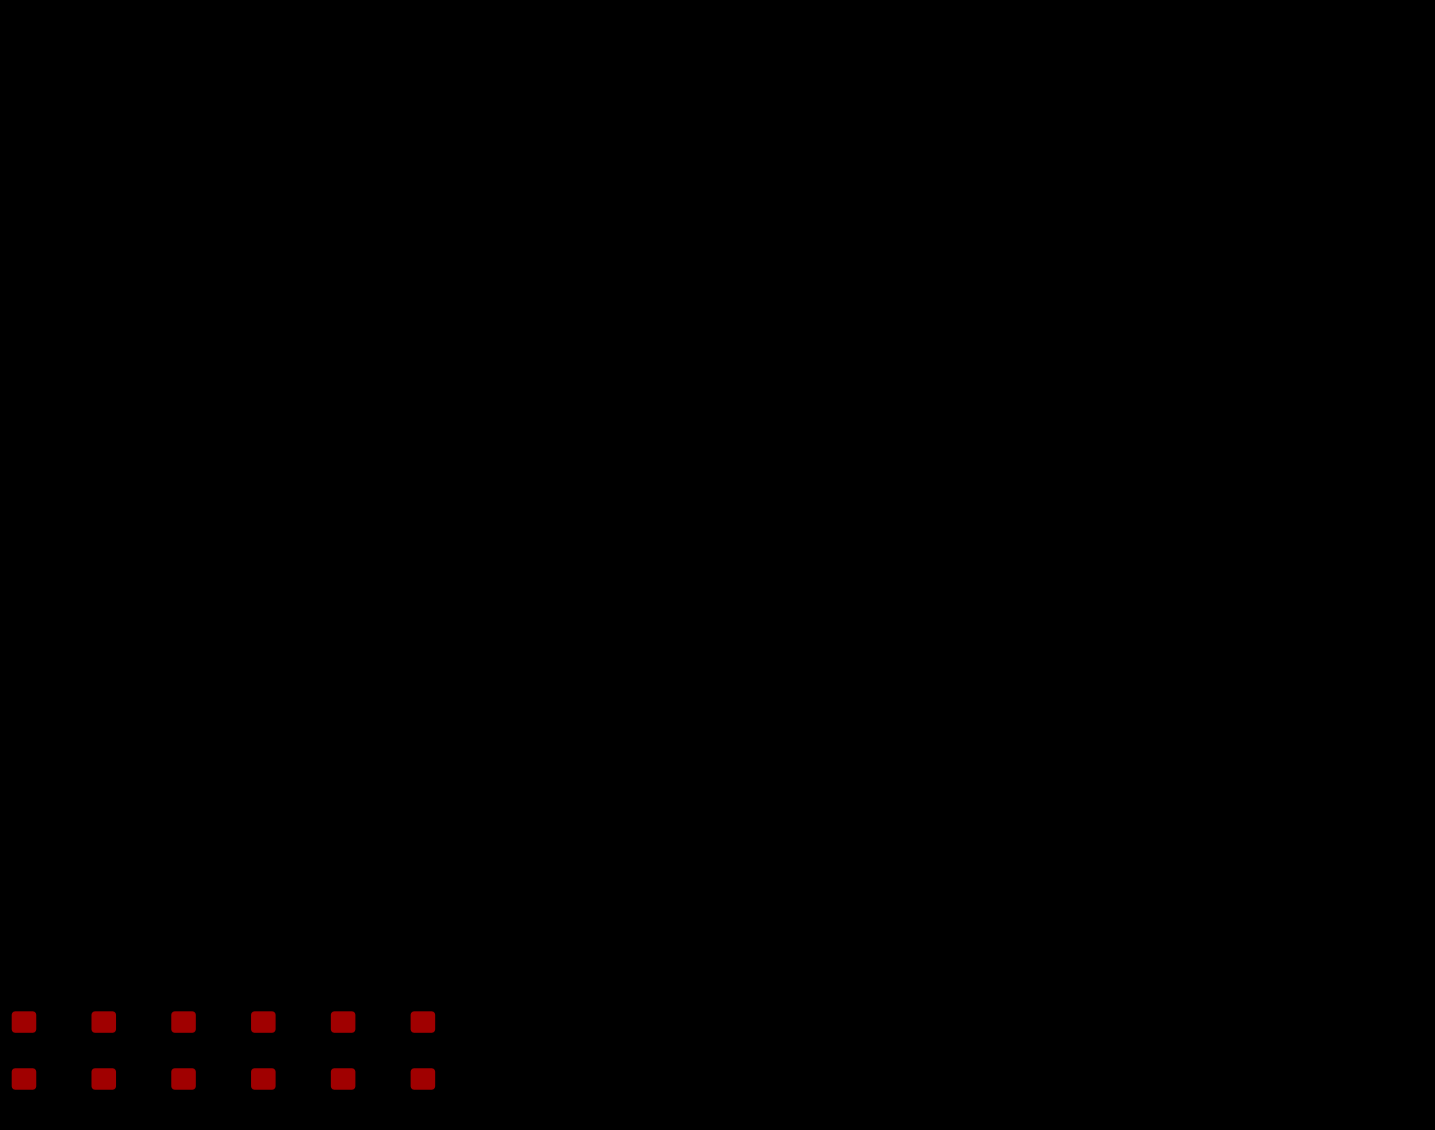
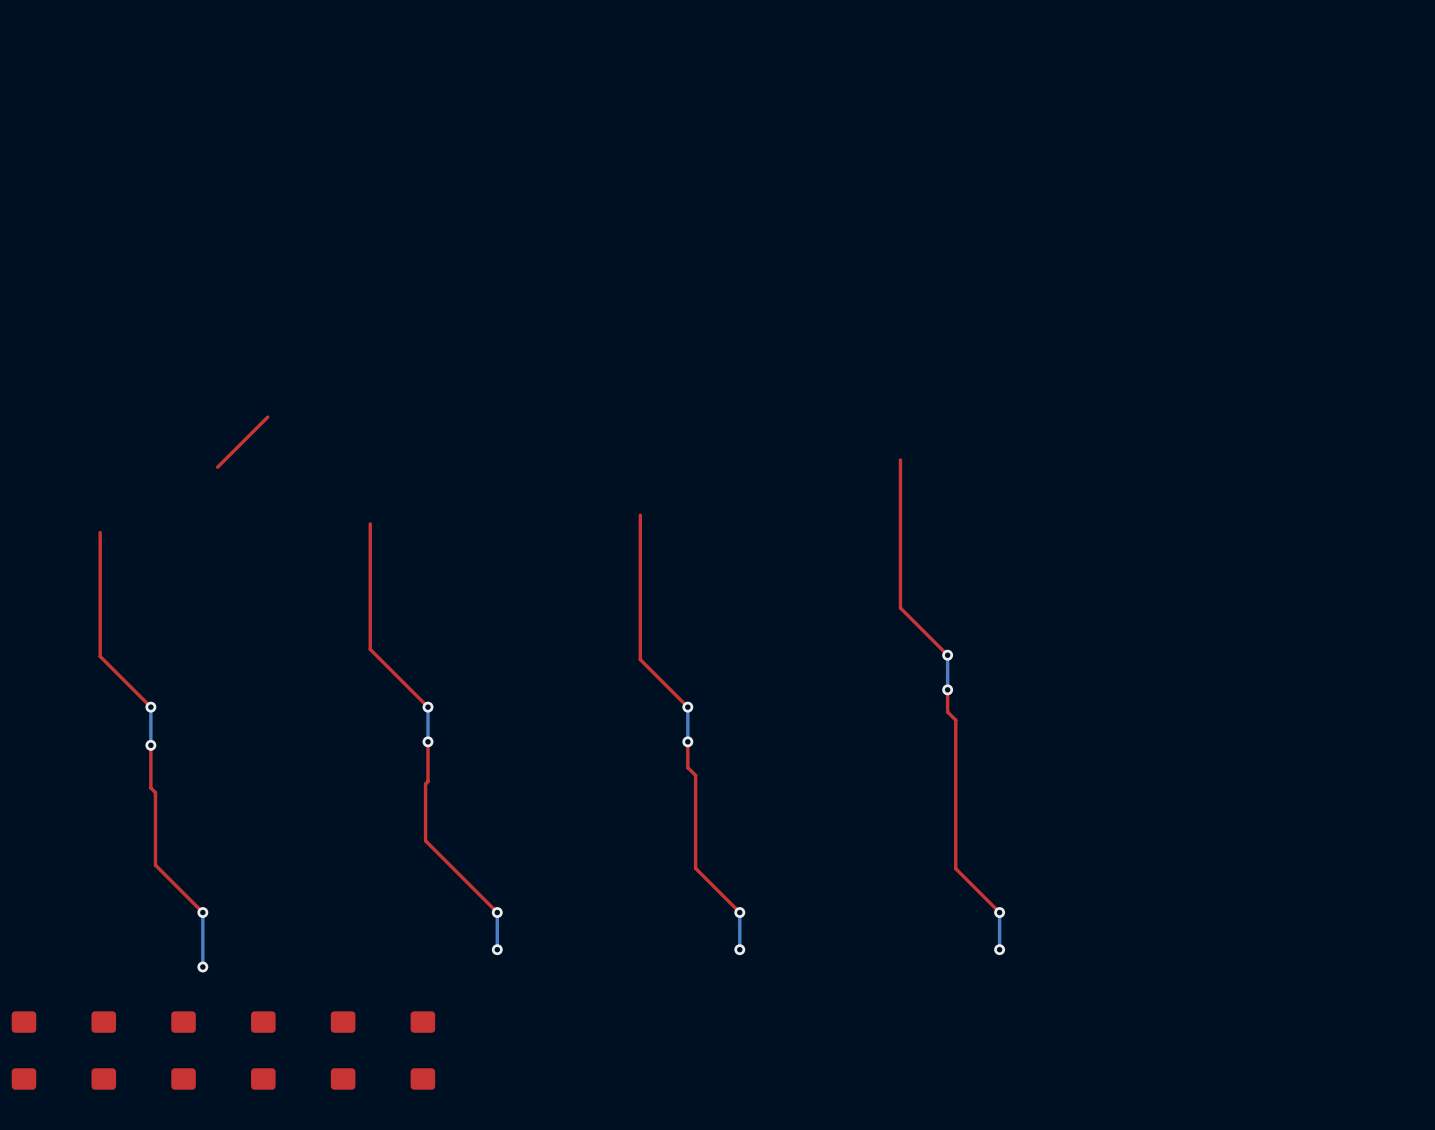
top track: none -> (267, 417) (217, 467)
top track: none -> (900, 460) (900, 608) (947, 655)
top track: none -> (640, 515) (640, 659) (687, 707)
top track: none -> (370, 523) (370, 649) (428, 707)
top track: none -> (100, 532) (100, 656) (150, 707)
bottom track: none -> (947, 655) (947, 689)
via: none -> (947, 655)
top track: none -> (947, 689) (947, 712) (955, 720) (955, 868) (999, 912)
via: none -> (947, 689)
bottom track: none -> (150, 707) (150, 745)
via: none -> (150, 707)
bottom track: none -> (428, 707) (428, 741)
via: none -> (428, 707)
bottom track: none -> (687, 707) (687, 741)
via: none -> (687, 707)
top track: none -> (428, 741) (425, 840) (497, 912)
via: none -> (428, 741)
top track: none -> (687, 741) (687, 767) (695, 775) (695, 868) (739, 912)
via: none -> (687, 741)
top track: none -> (150, 745) (150, 788) (155, 792) (155, 865) (202, 912)
via: none -> (150, 745)
bottom track: none -> (202, 912) (202, 966)
via: none -> (202, 912)
bottom track: none -> (497, 912) (497, 949)
via: none -> (497, 912)
bottom track: none -> (739, 912) (739, 949)
via: none -> (739, 912)
bottom track: none -> (999, 912) (999, 949)
via: none -> (999, 912)
via: none -> (497, 949)
via: none -> (739, 949)
via: none -> (999, 949)
via: none -> (202, 966)

